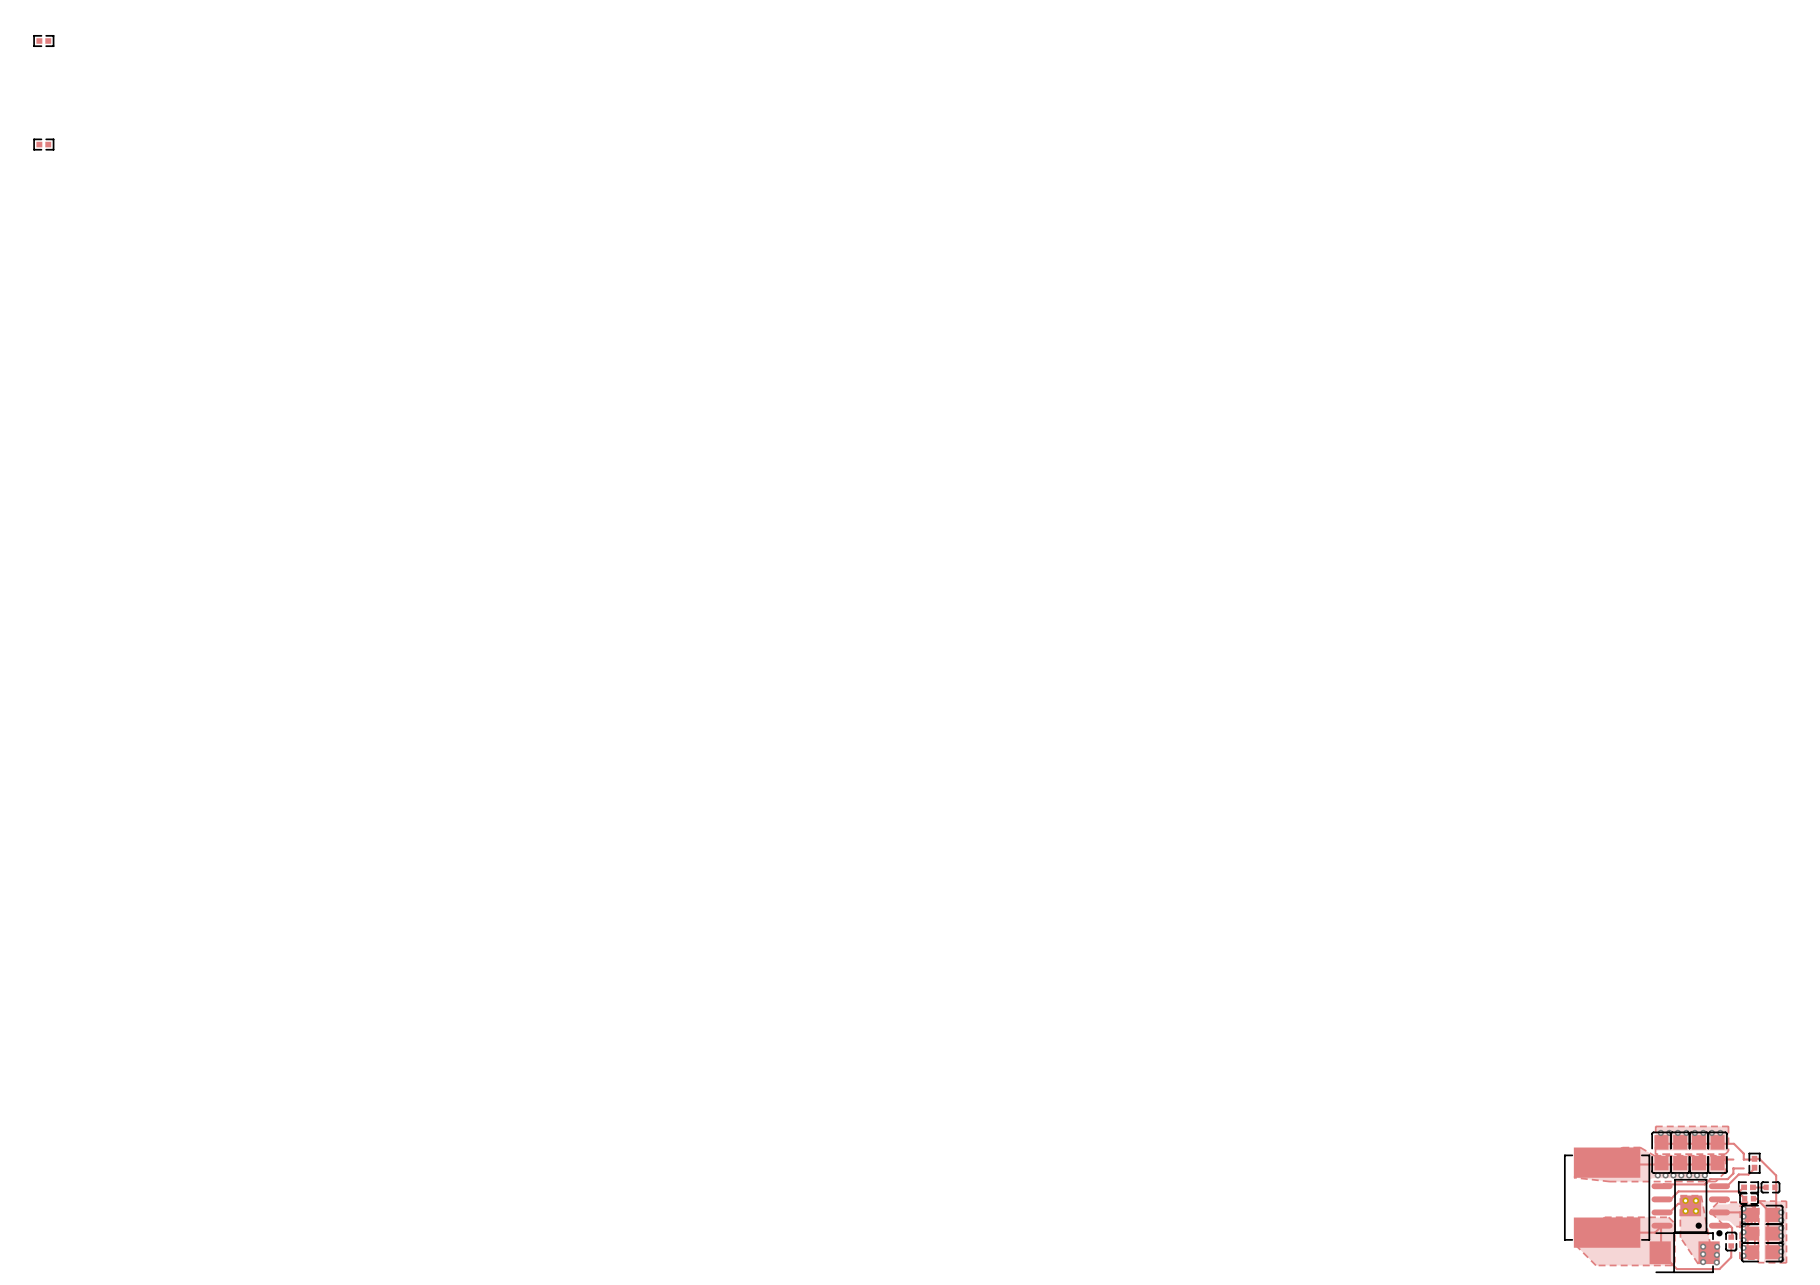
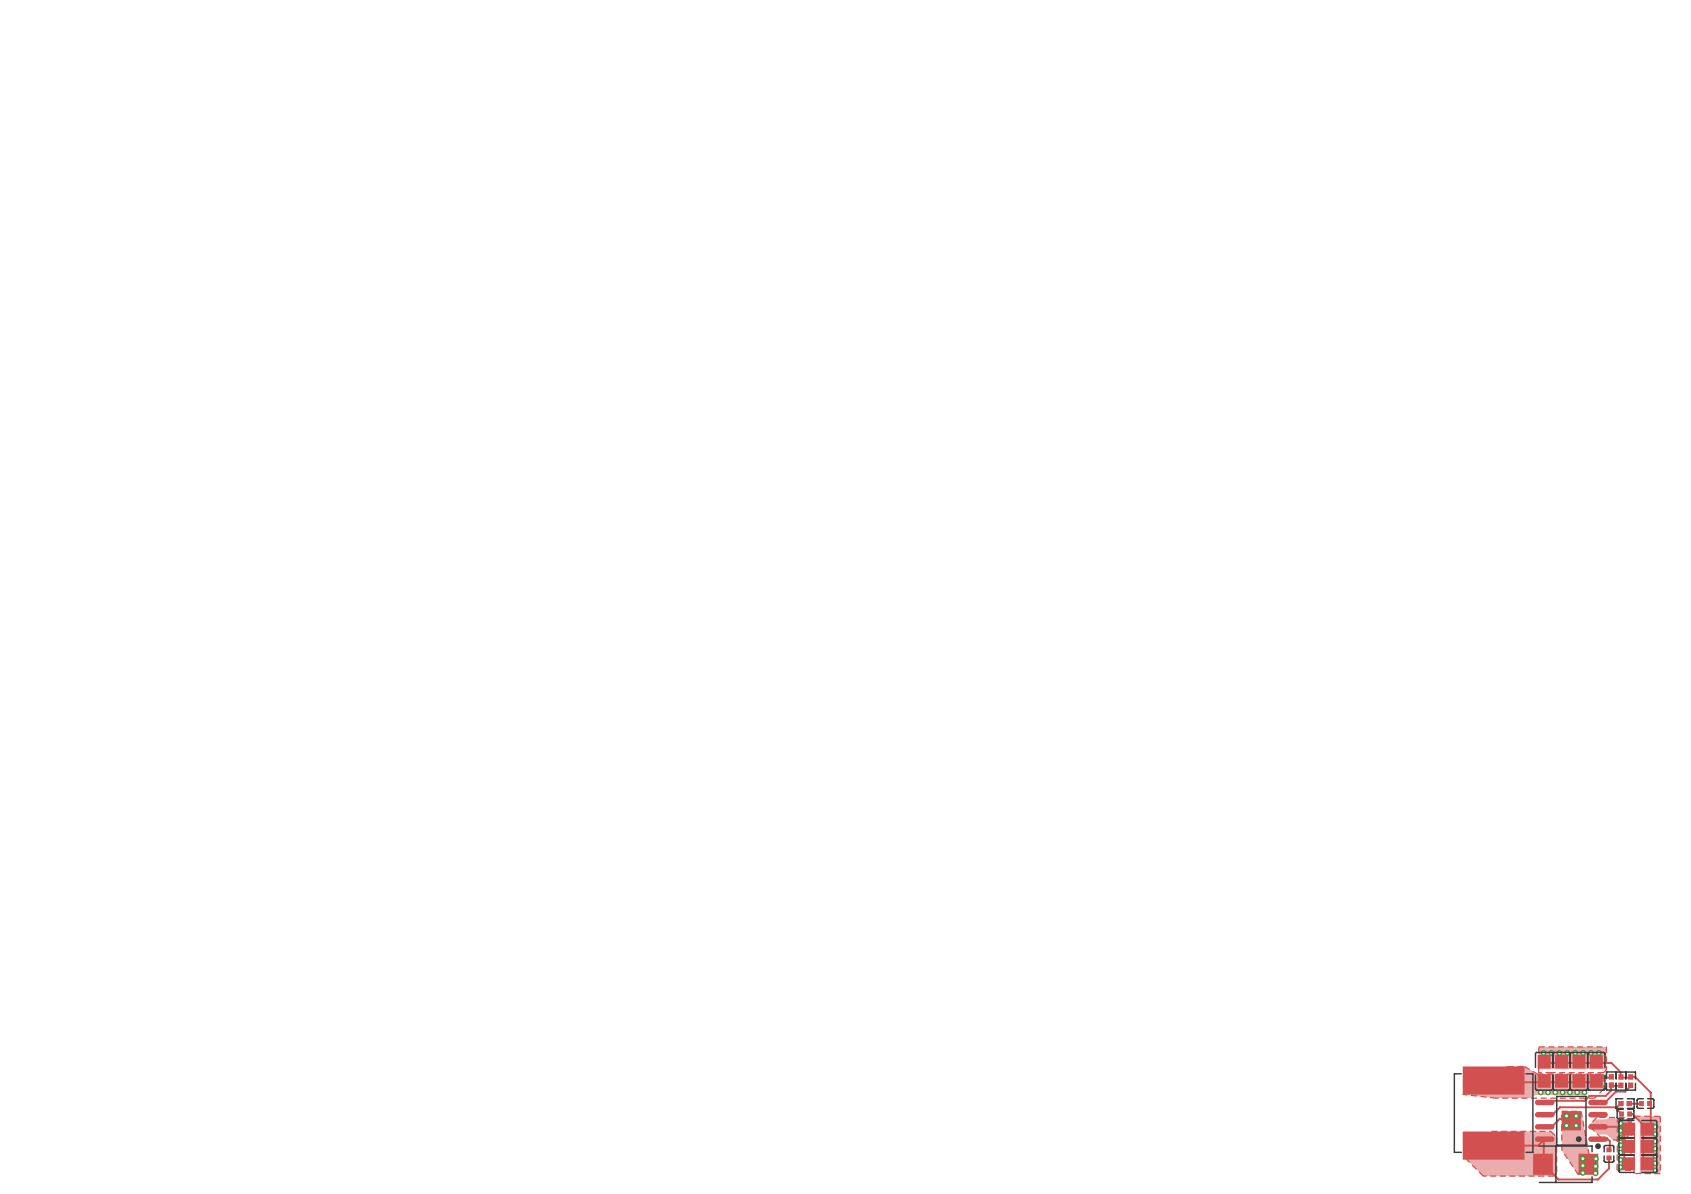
part: (43, 41) -> none
part: (43, 144) -> none
part: none -> (1611, 1080)
part: none -> (1620, 1081)

